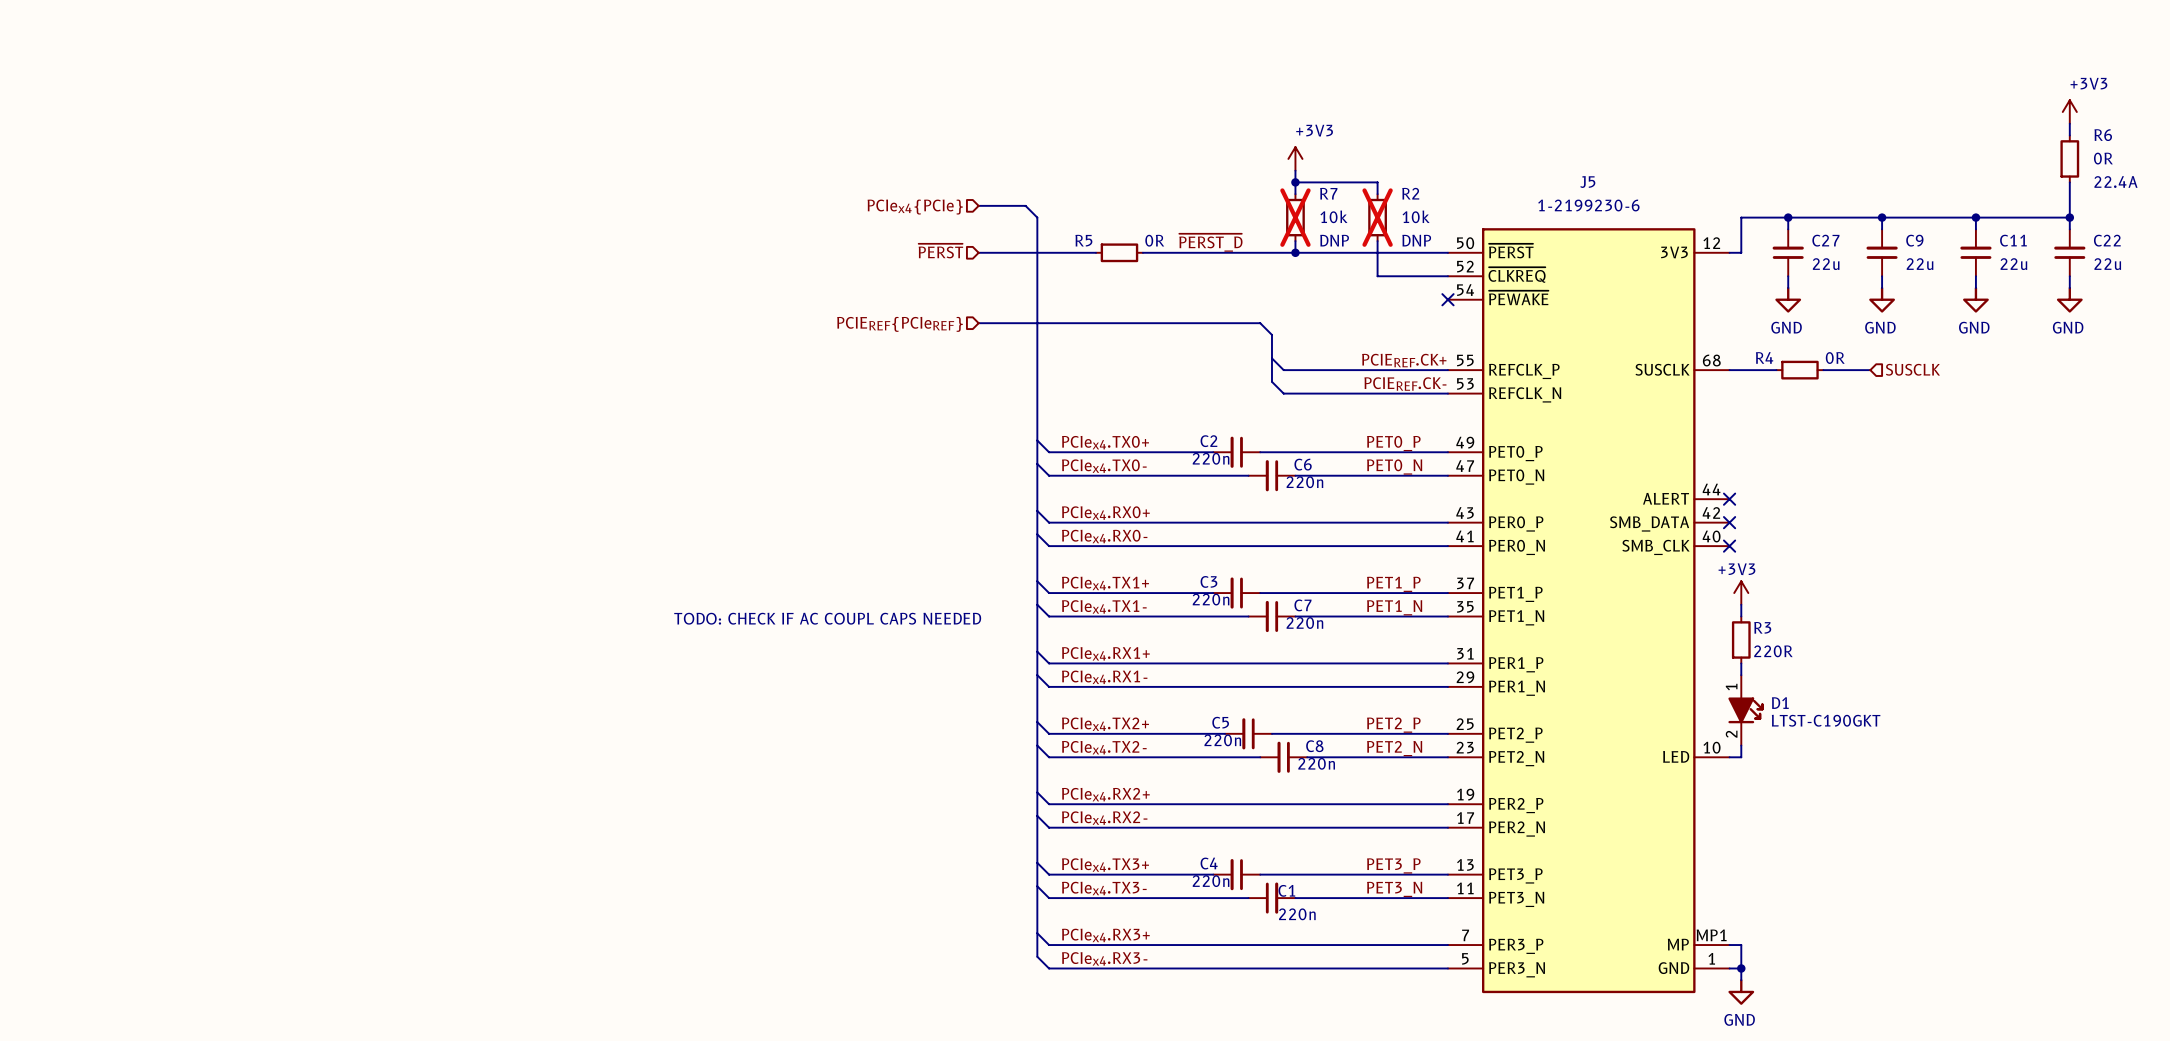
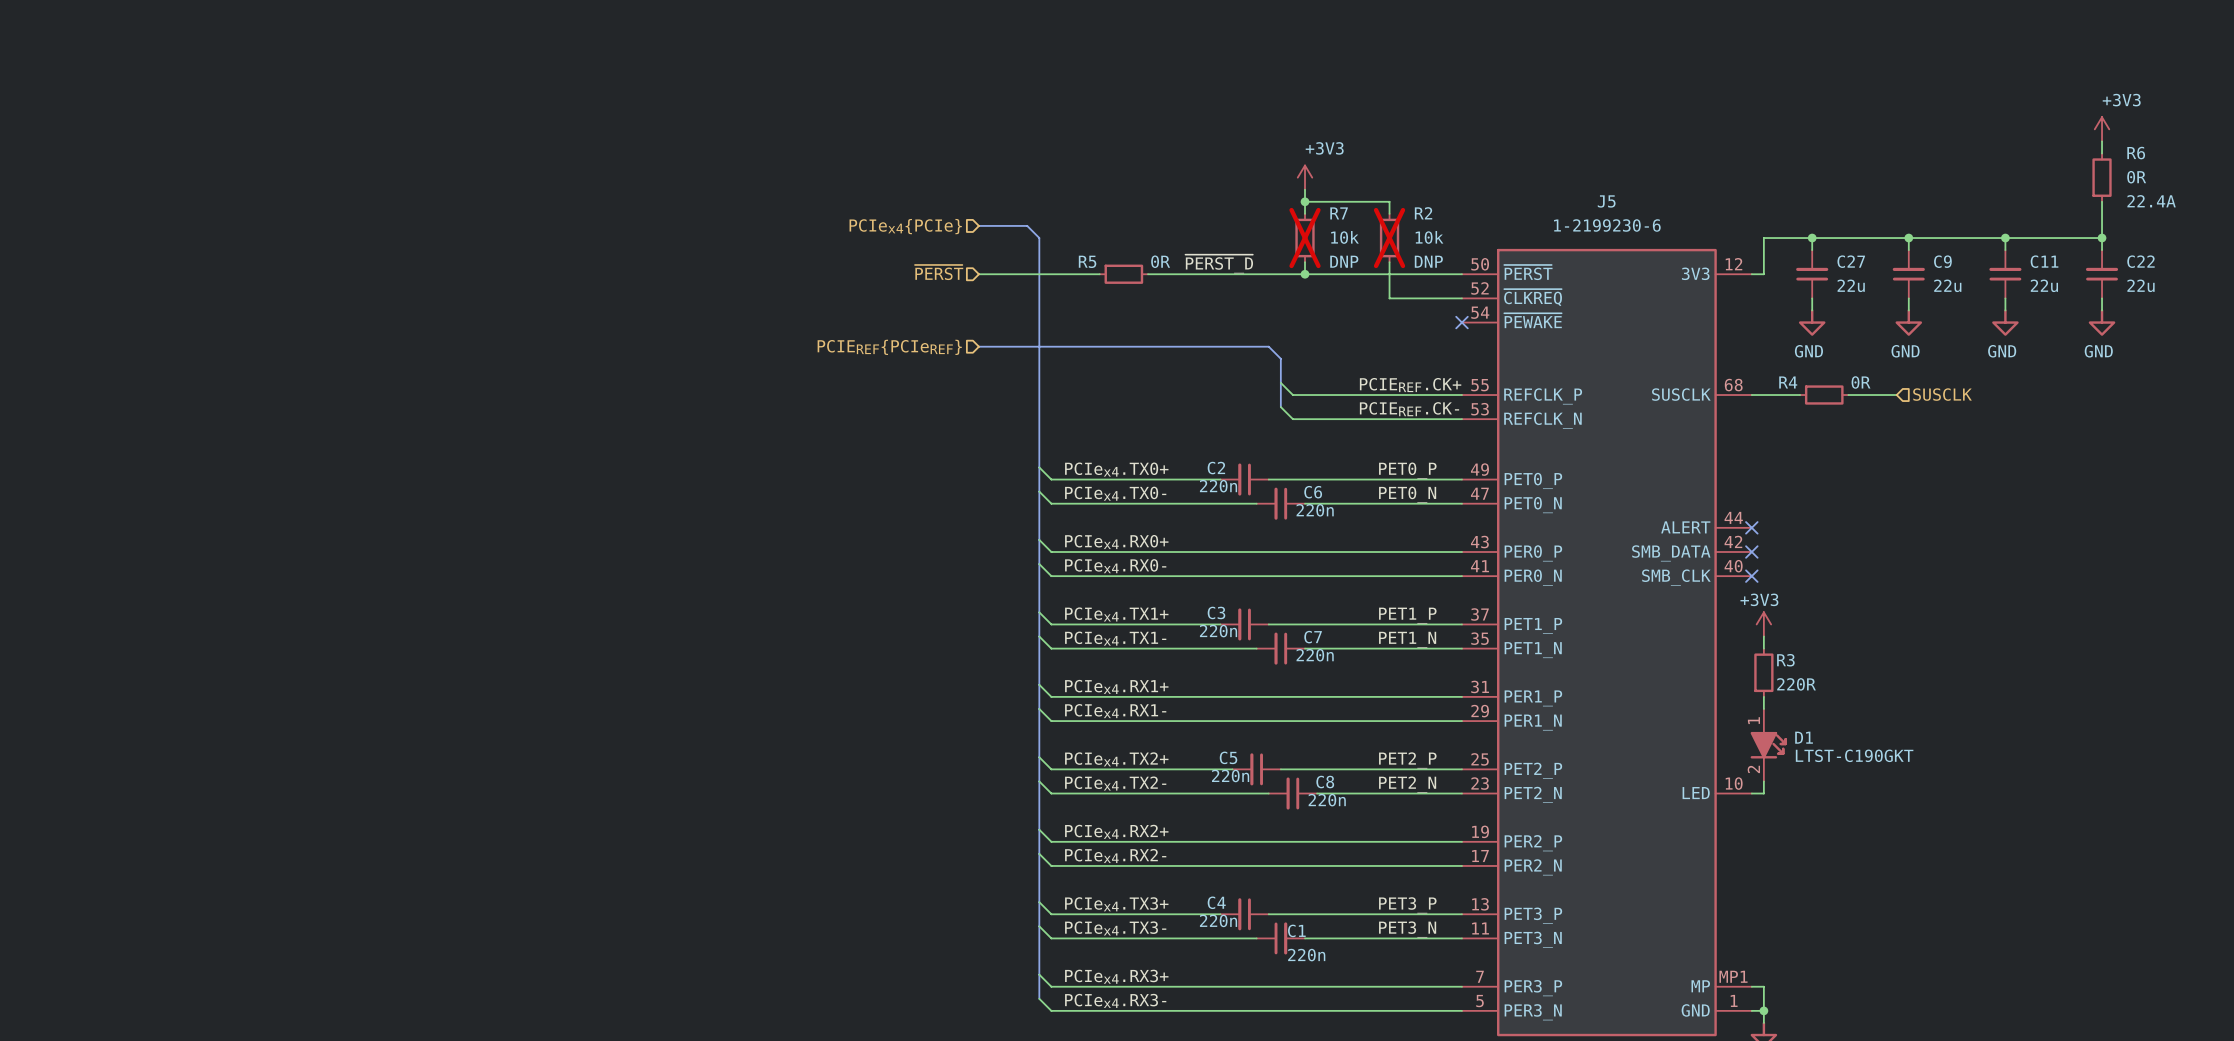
text: TODO: CHECK IF AC COUPL CAPS NEEDED (827, 618) -> none

